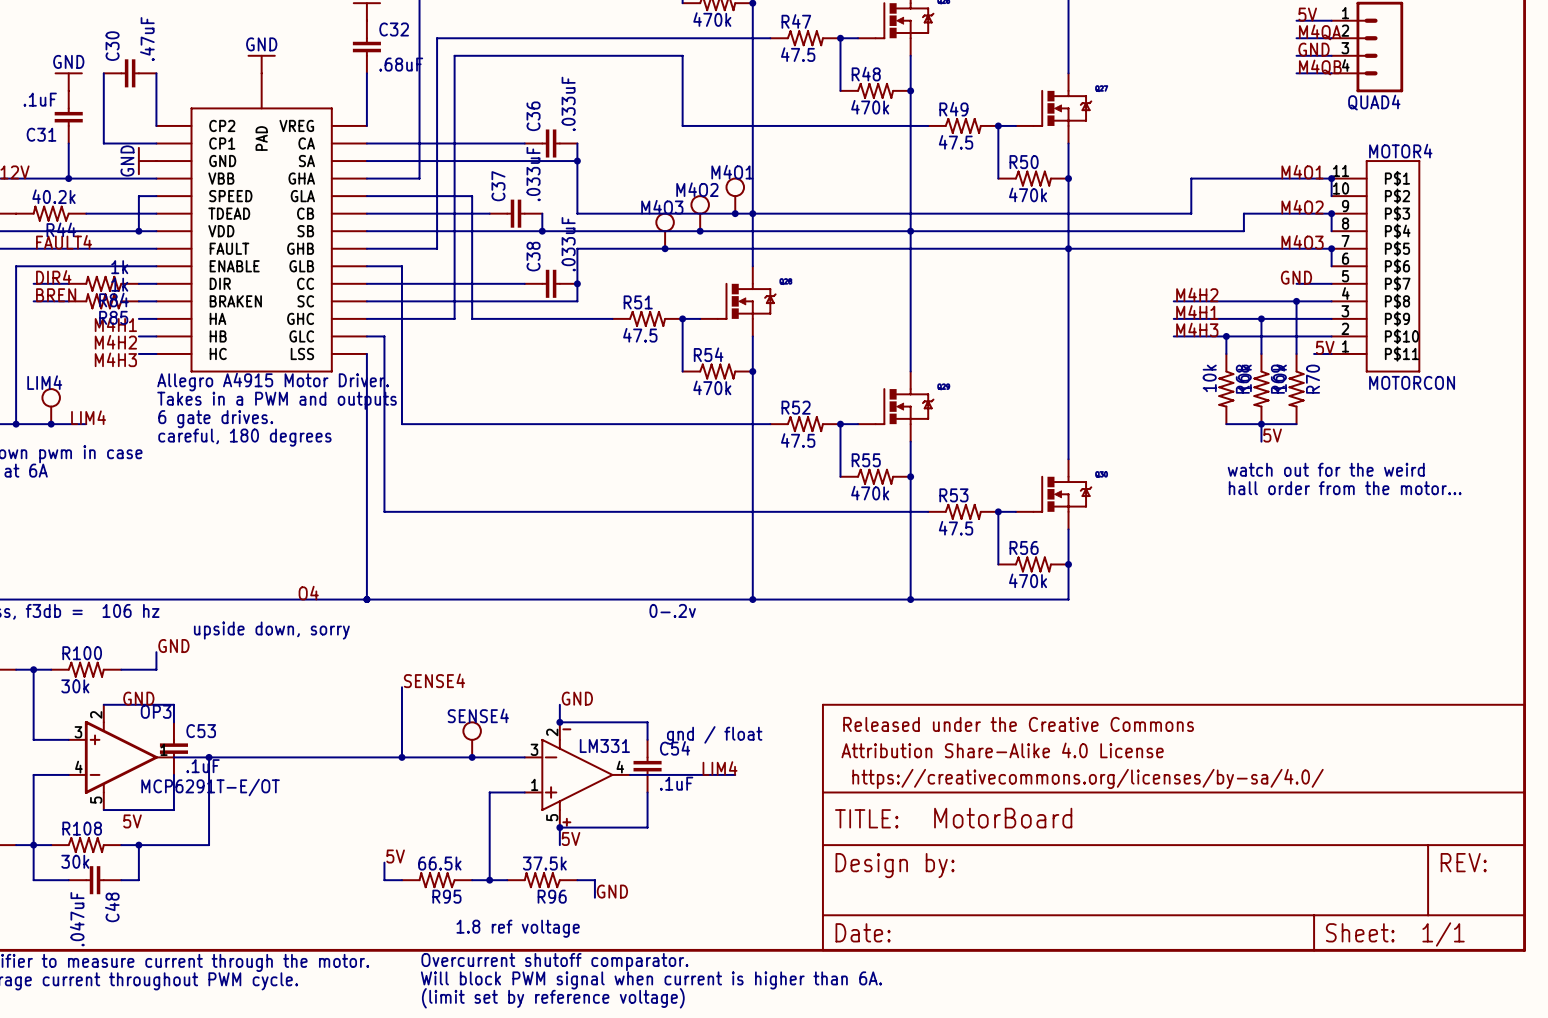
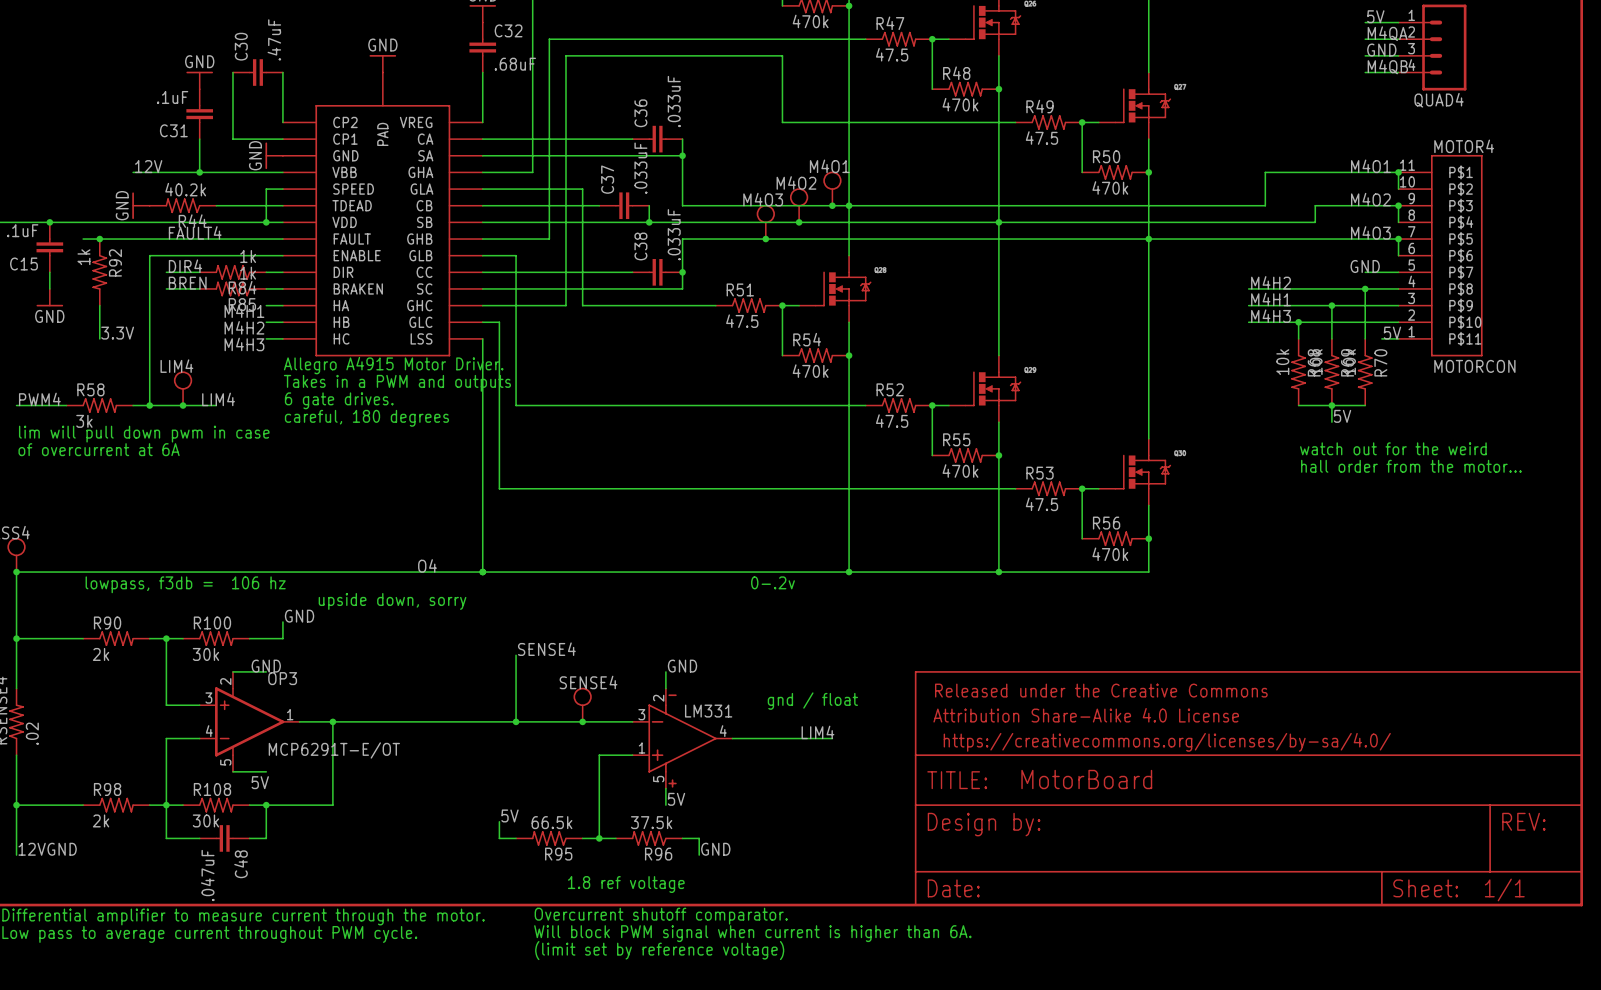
wire: (138, 704) (173, 704) (173, 722) -> none
wire: (559, 722) (647, 722) (647, 739) -> none
junction: (559, 722) -> none
C53: .1uF (173, 748) -> none
C54: .1uF (647, 766) -> none
wire: (173, 774) (173, 810) (138, 810) -> none
wire: (647, 792) (647, 827) (559, 827) -> none
junction: (559, 827) -> none

